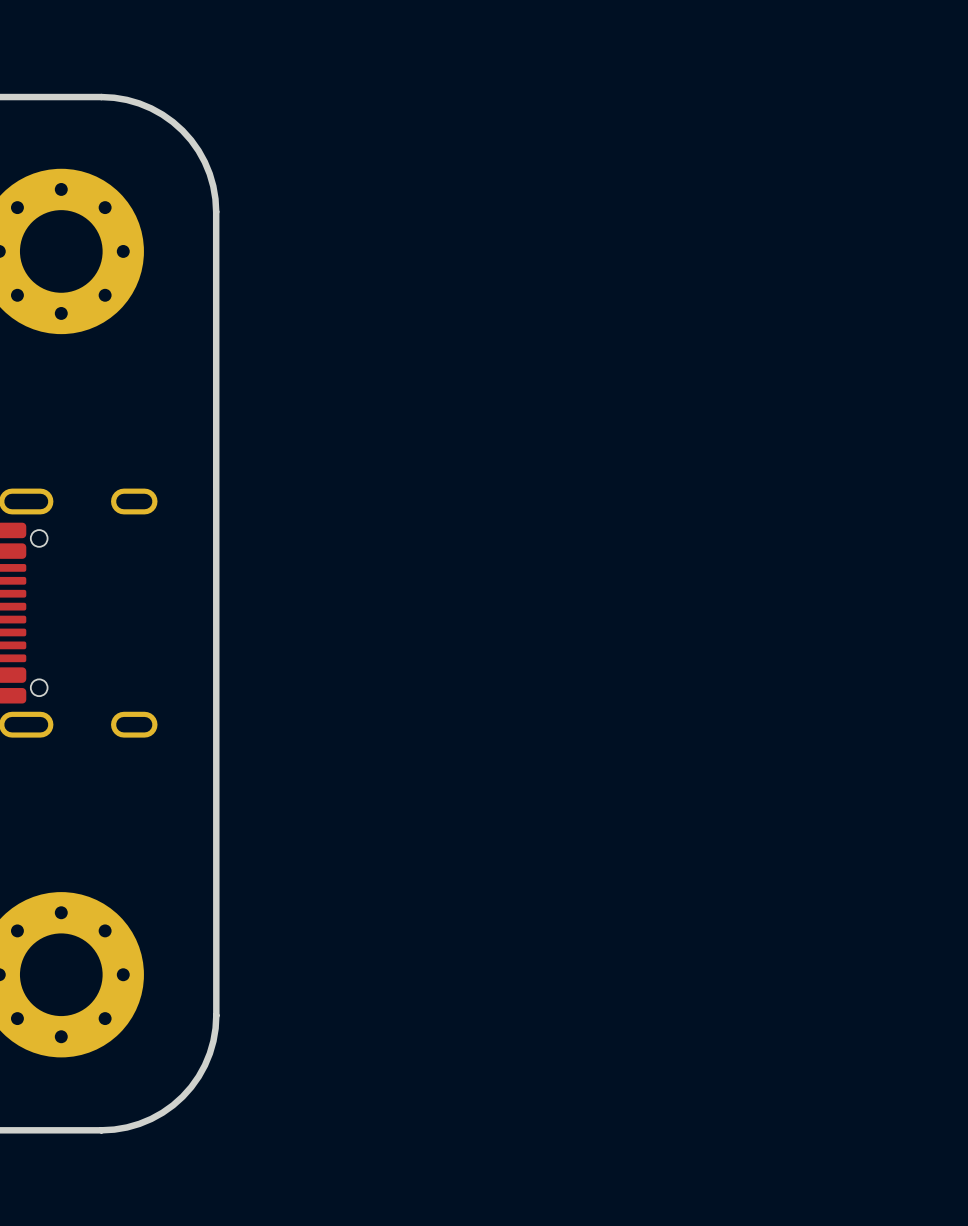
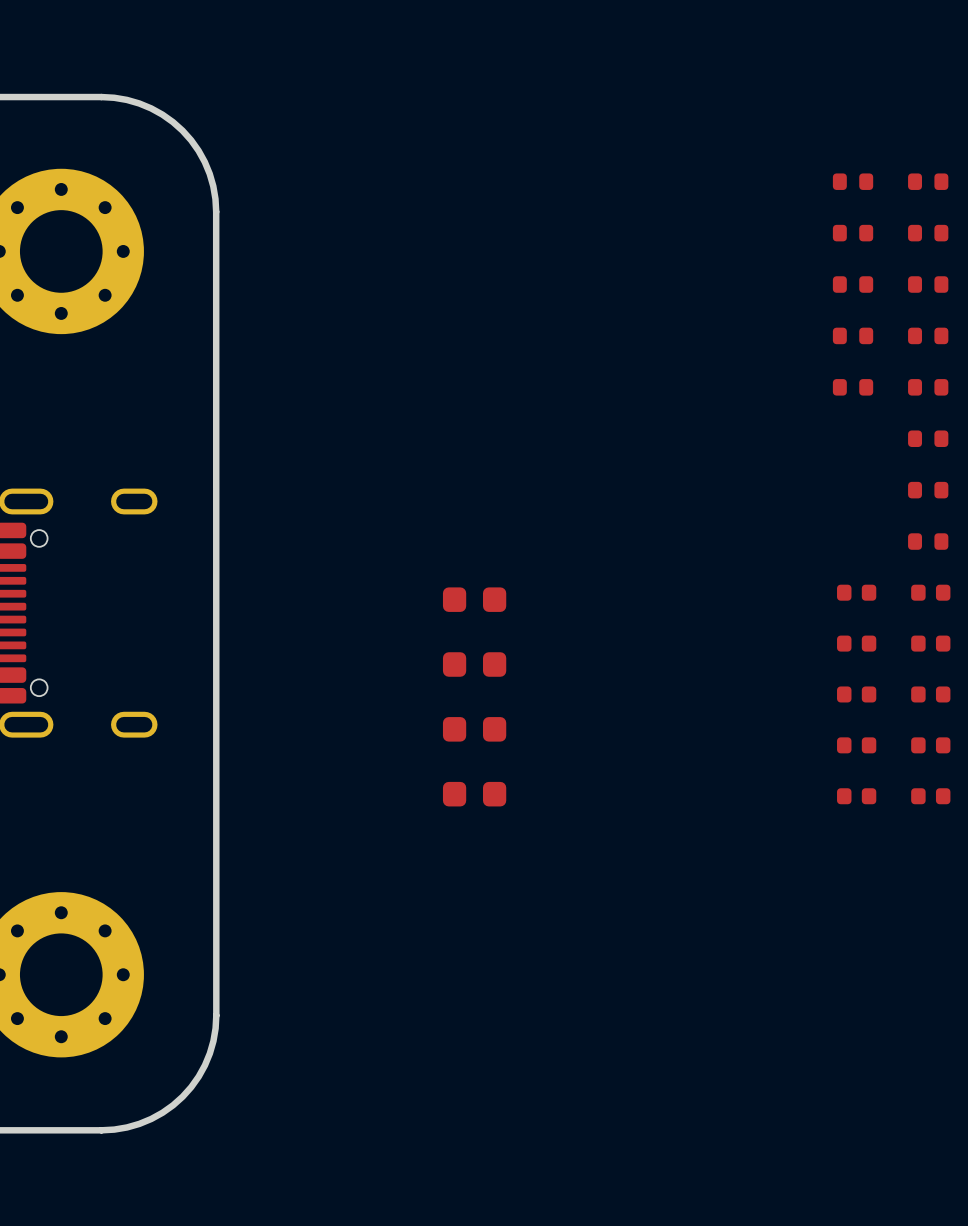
part: none -> (853, 181)
part: none -> (928, 181)
part: none -> (853, 233)
part: none -> (928, 233)
part: none -> (853, 284)
part: none -> (928, 284)
part: none -> (853, 335)
part: none -> (928, 335)
part: none -> (853, 387)
part: none -> (928, 387)
part: none -> (928, 438)
part: none -> (928, 490)
part: none -> (928, 541)
part: none -> (856, 592)
part: none -> (930, 592)
part: none -> (474, 599)
part: none -> (856, 643)
part: none -> (930, 643)
part: none -> (474, 664)
part: none -> (856, 694)
part: none -> (930, 694)
part: none -> (474, 729)
part: none -> (856, 745)
part: none -> (930, 745)
part: none -> (474, 794)
part: none -> (856, 796)
part: none -> (930, 796)

